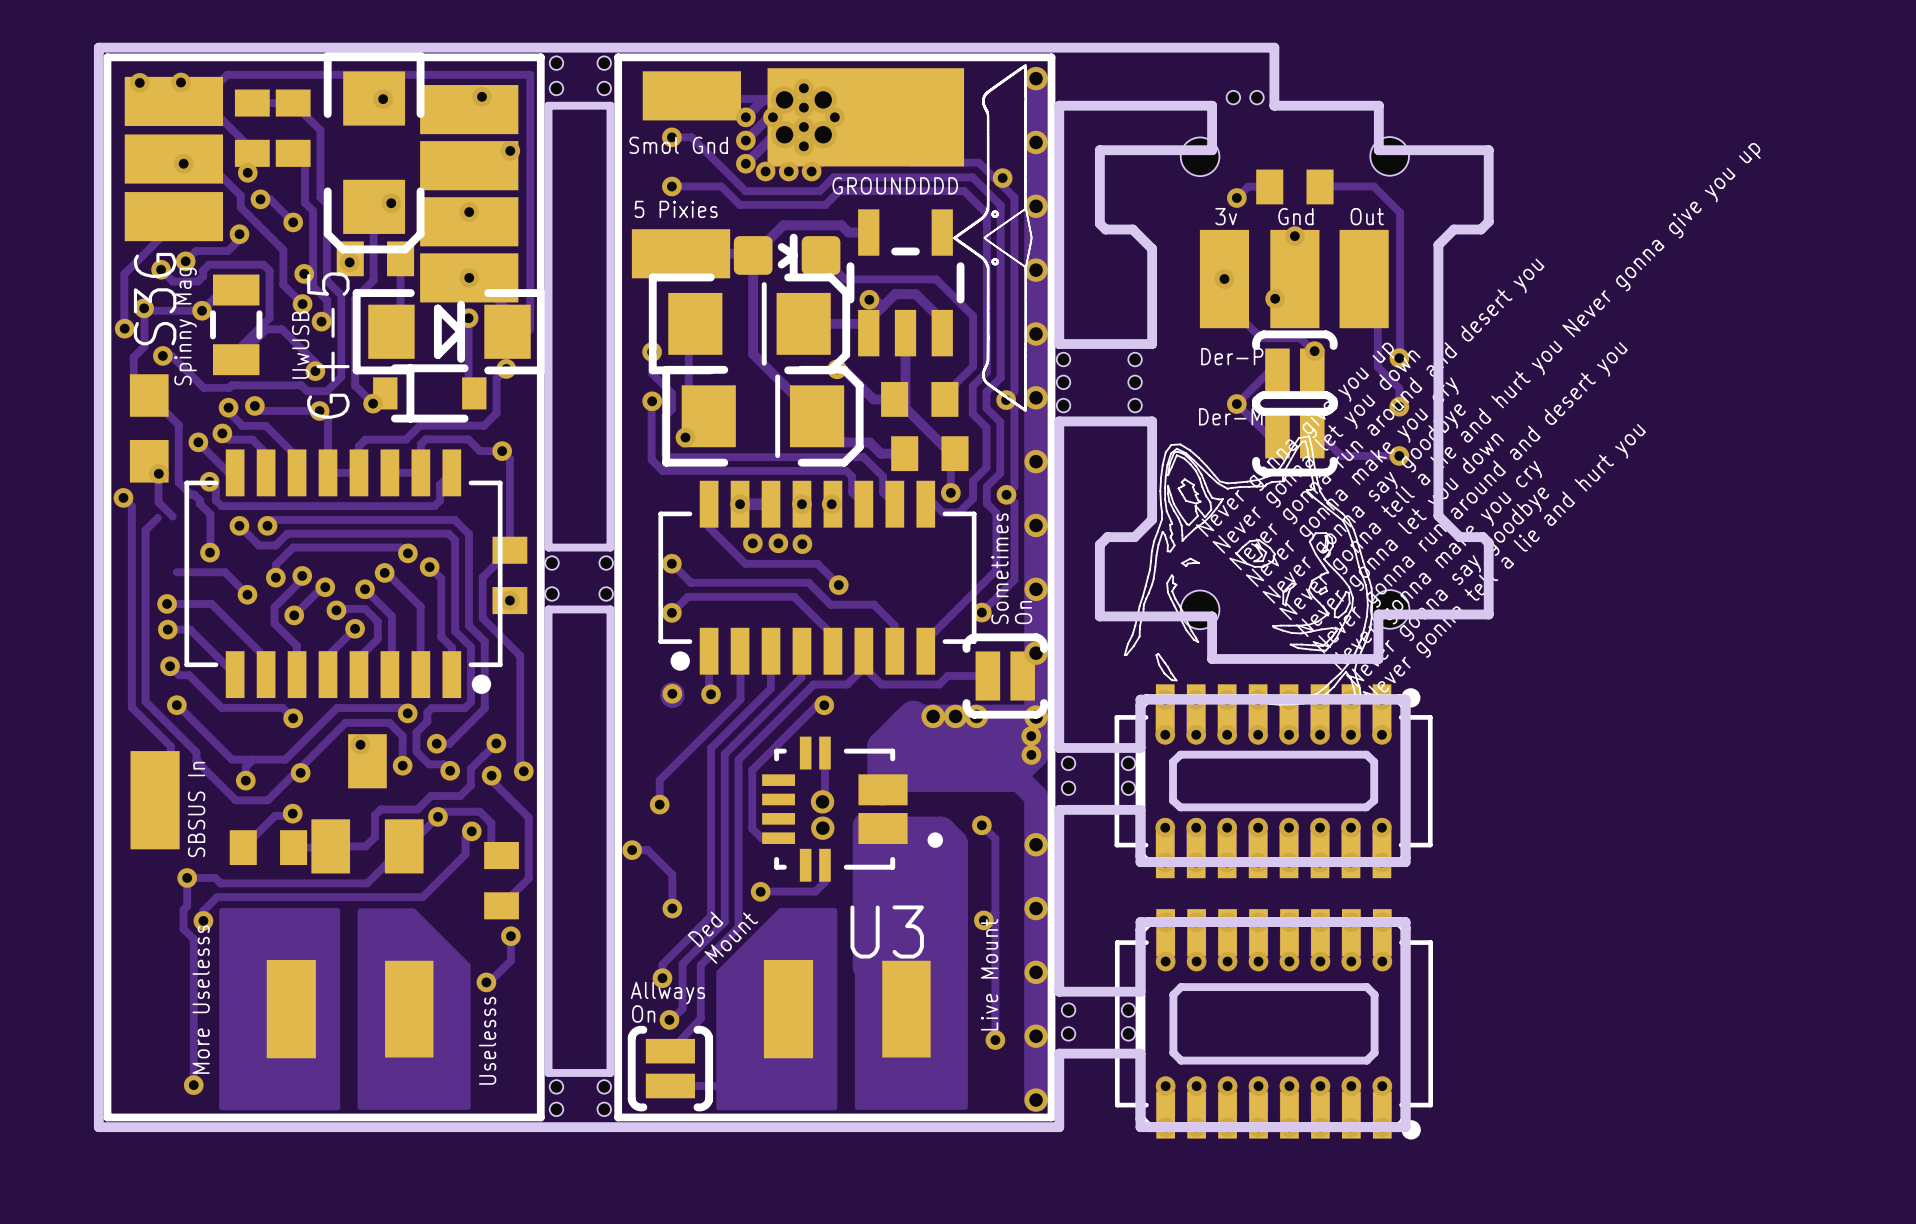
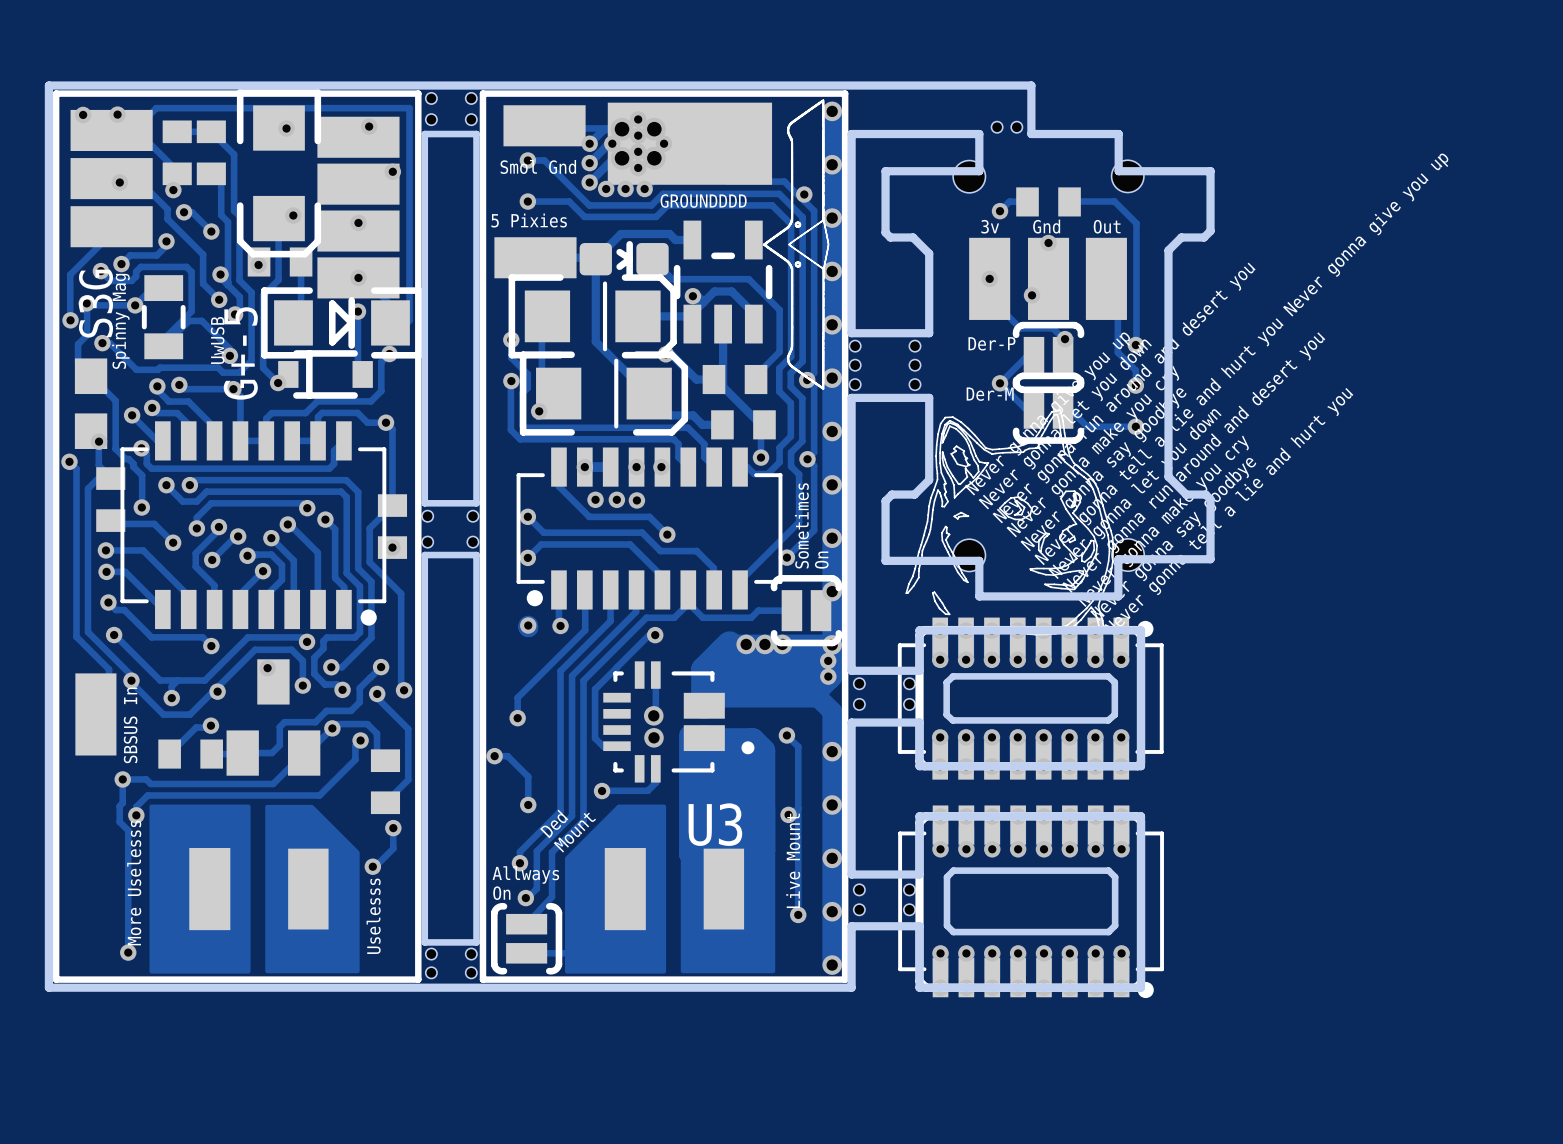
part: none -> (110, 499)
via: none -> (131, 680)

